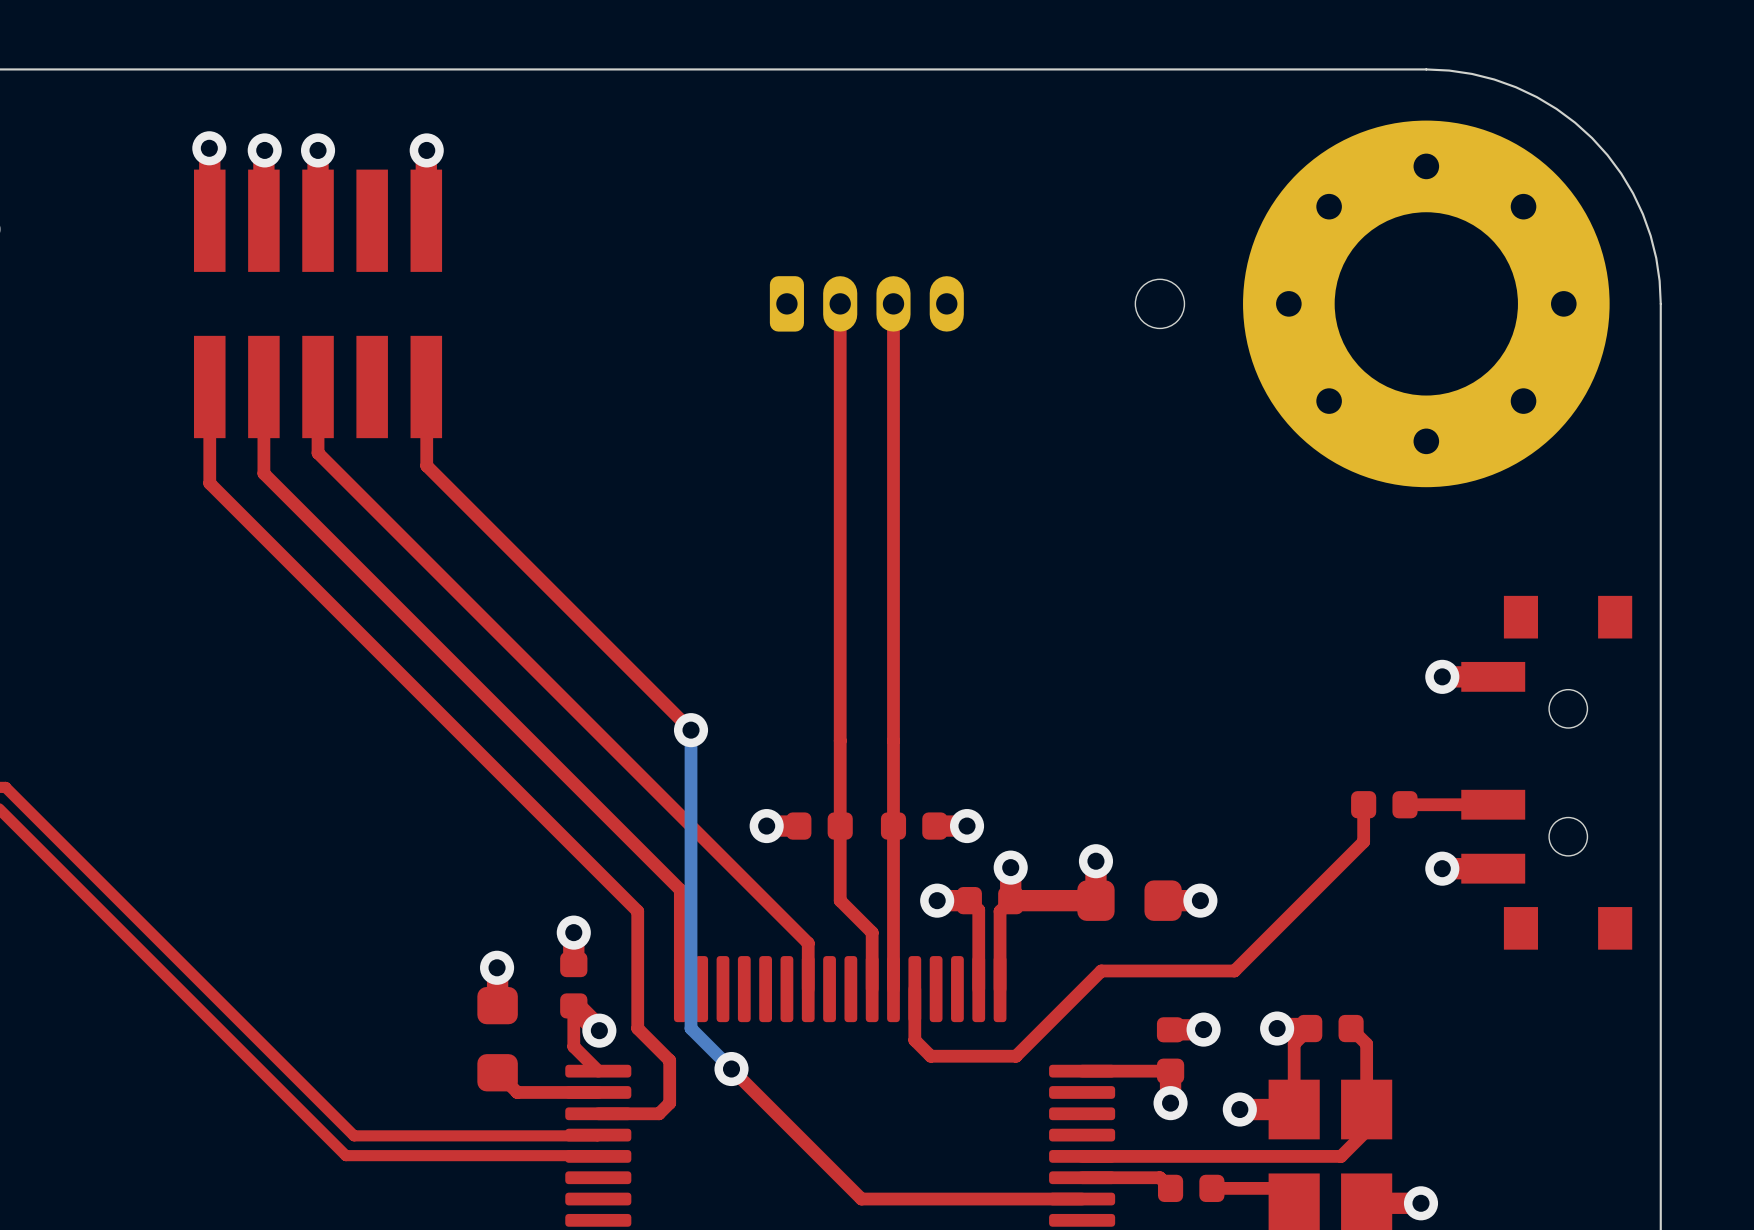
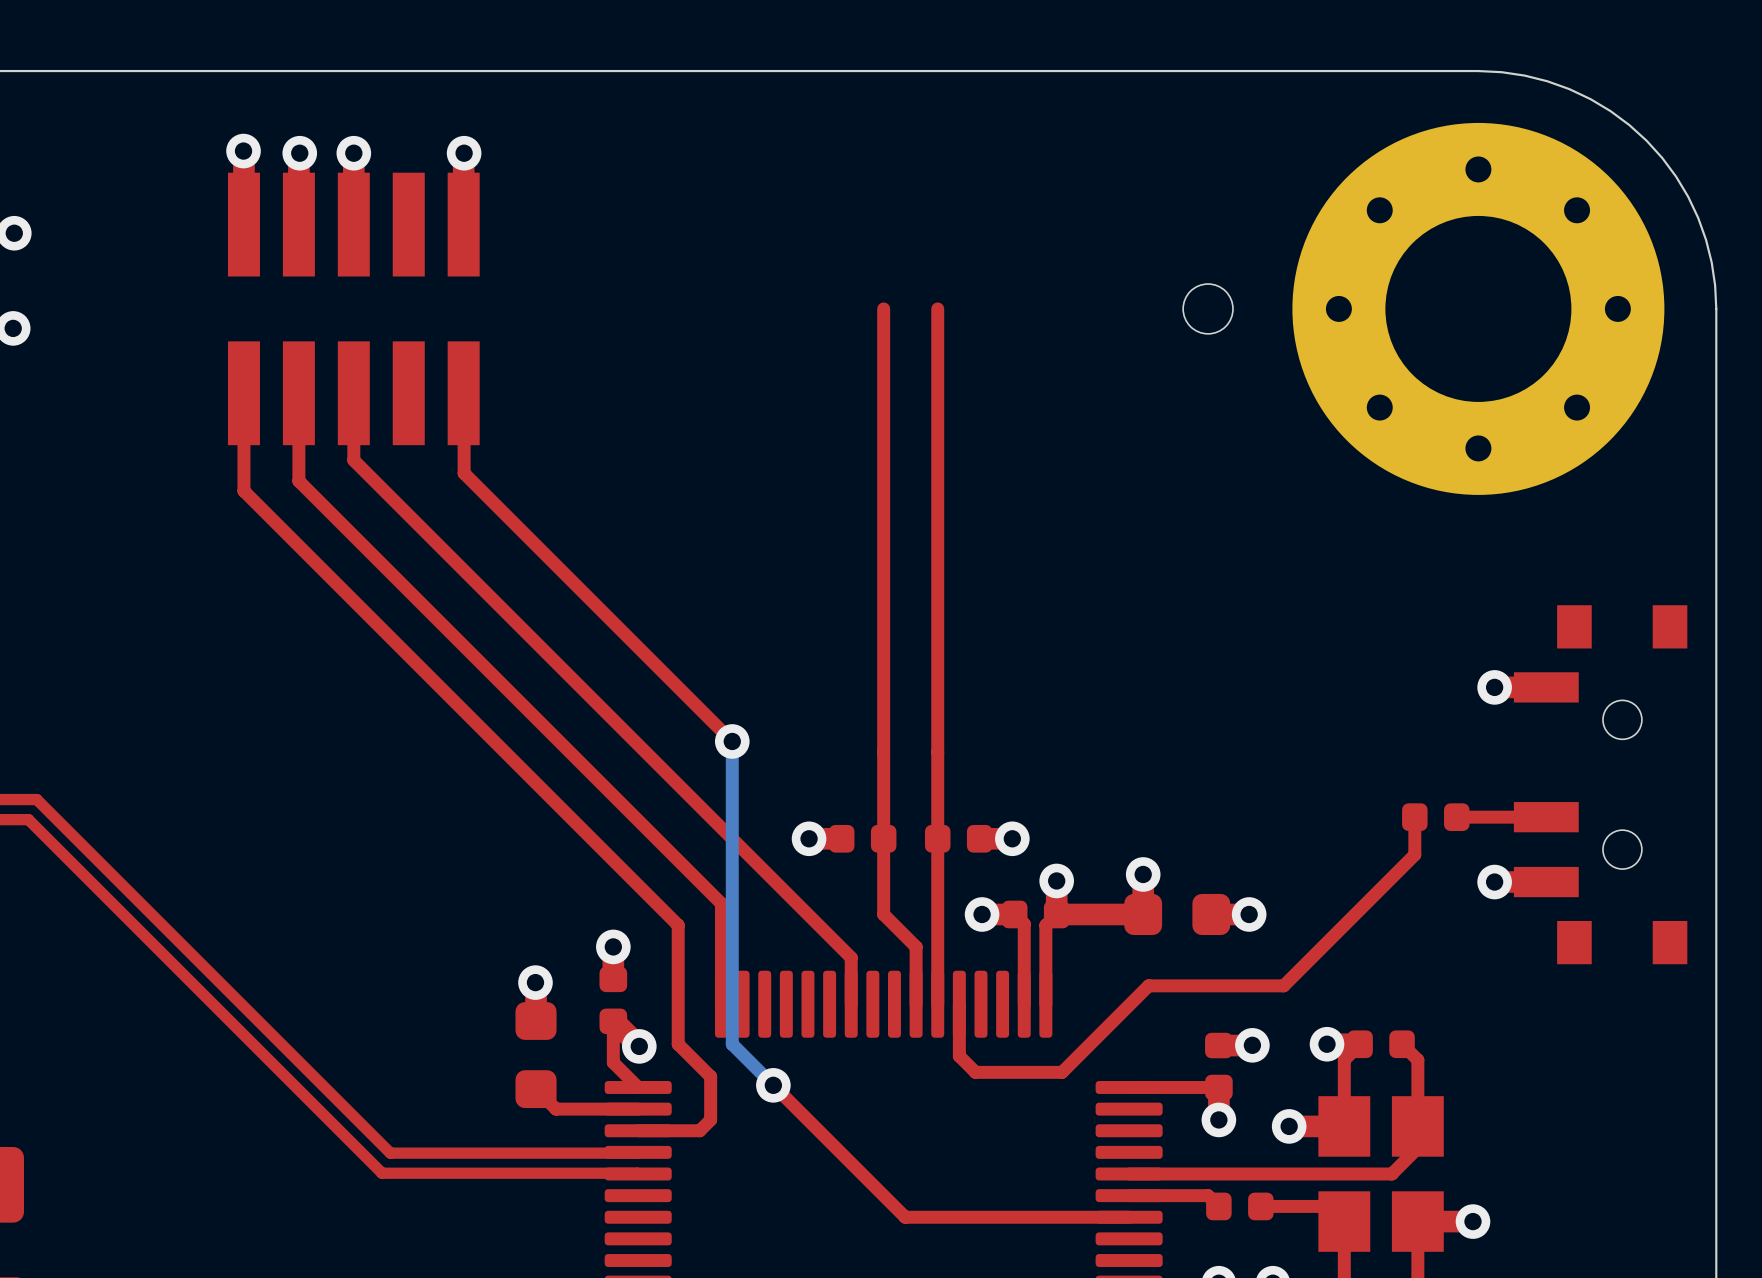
part: (866, 303) -> none

